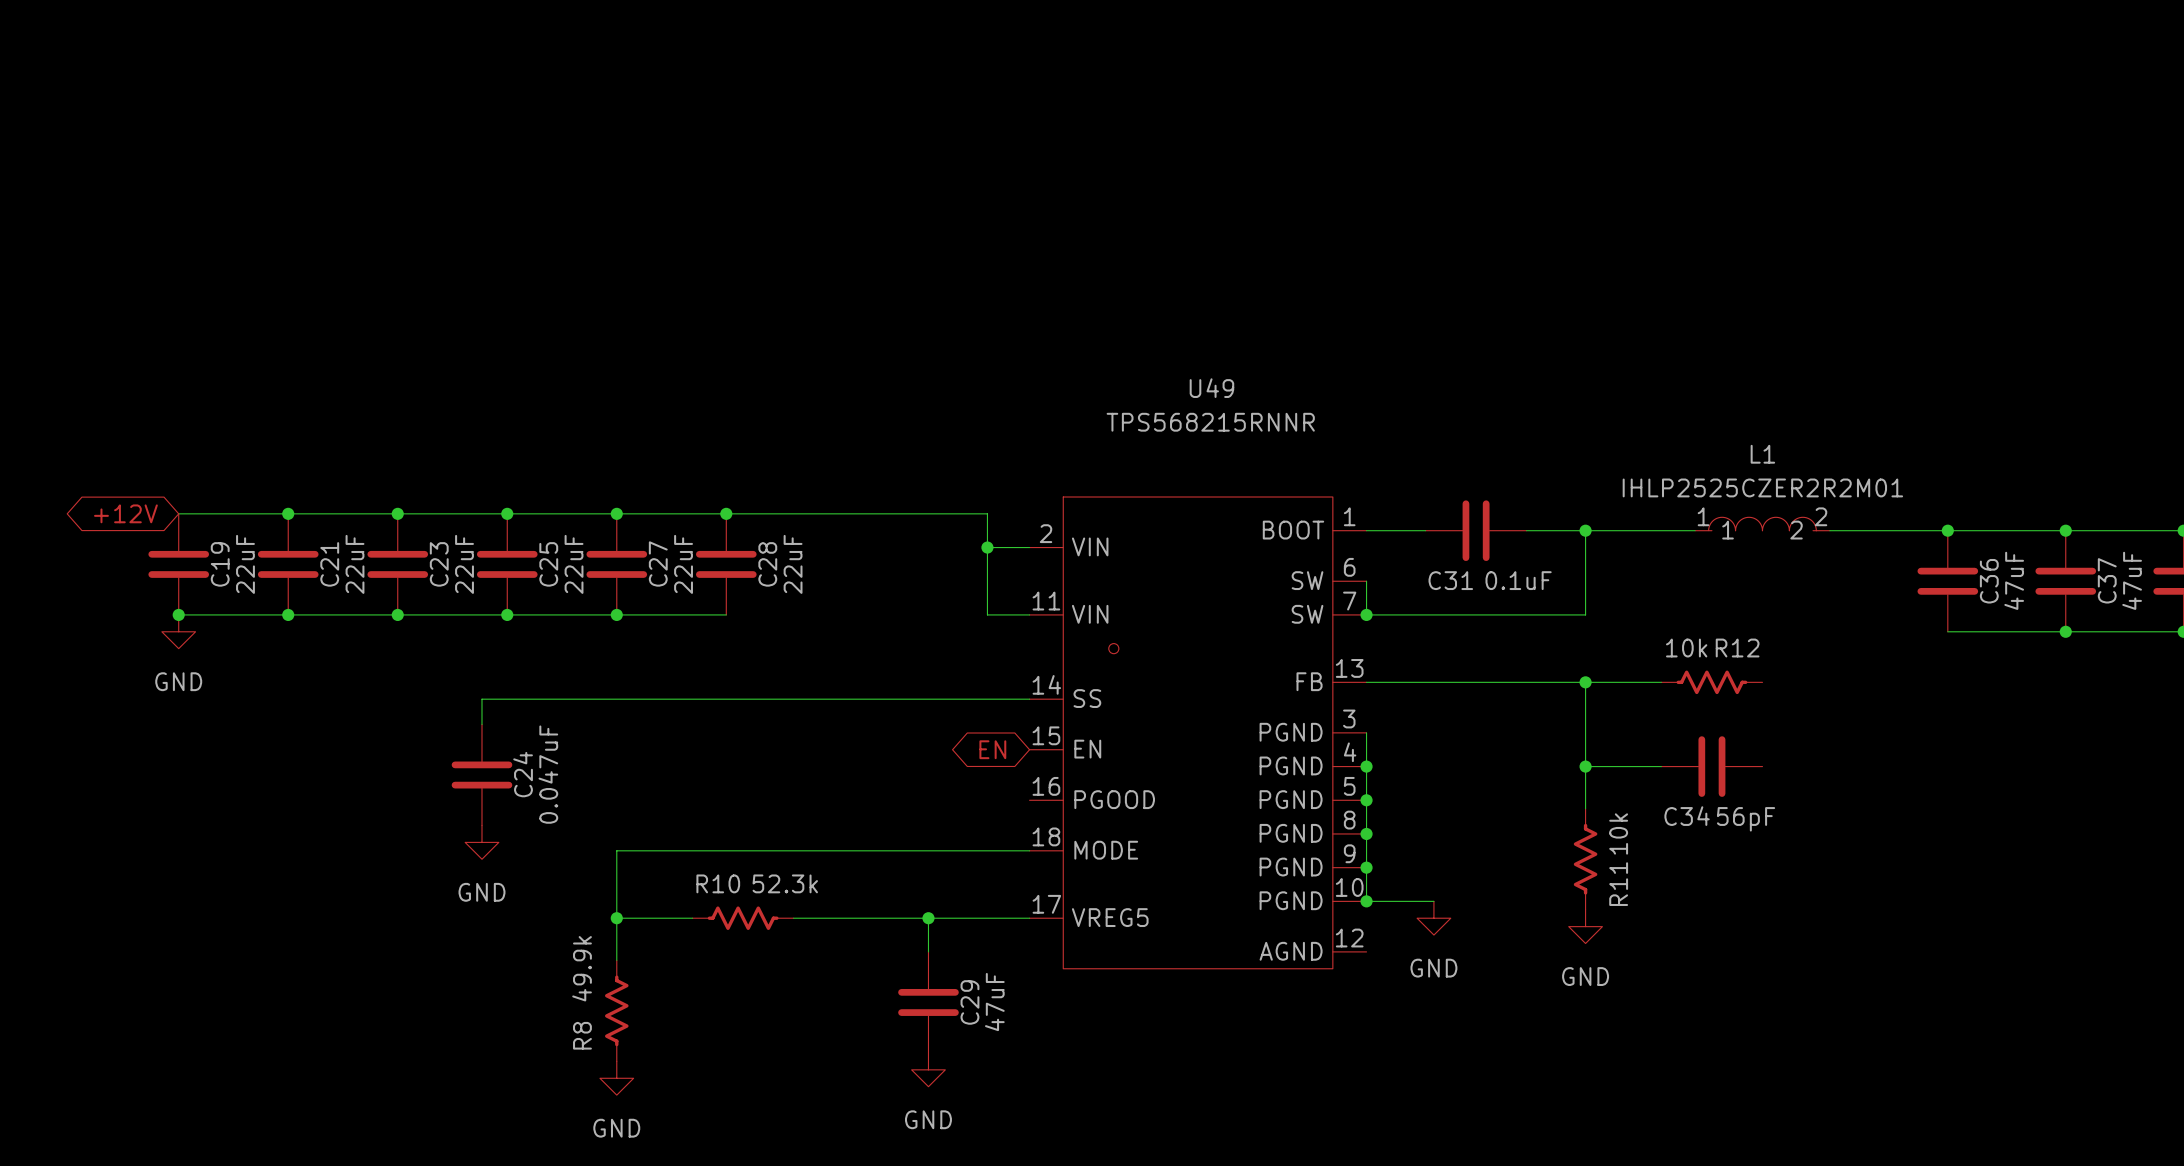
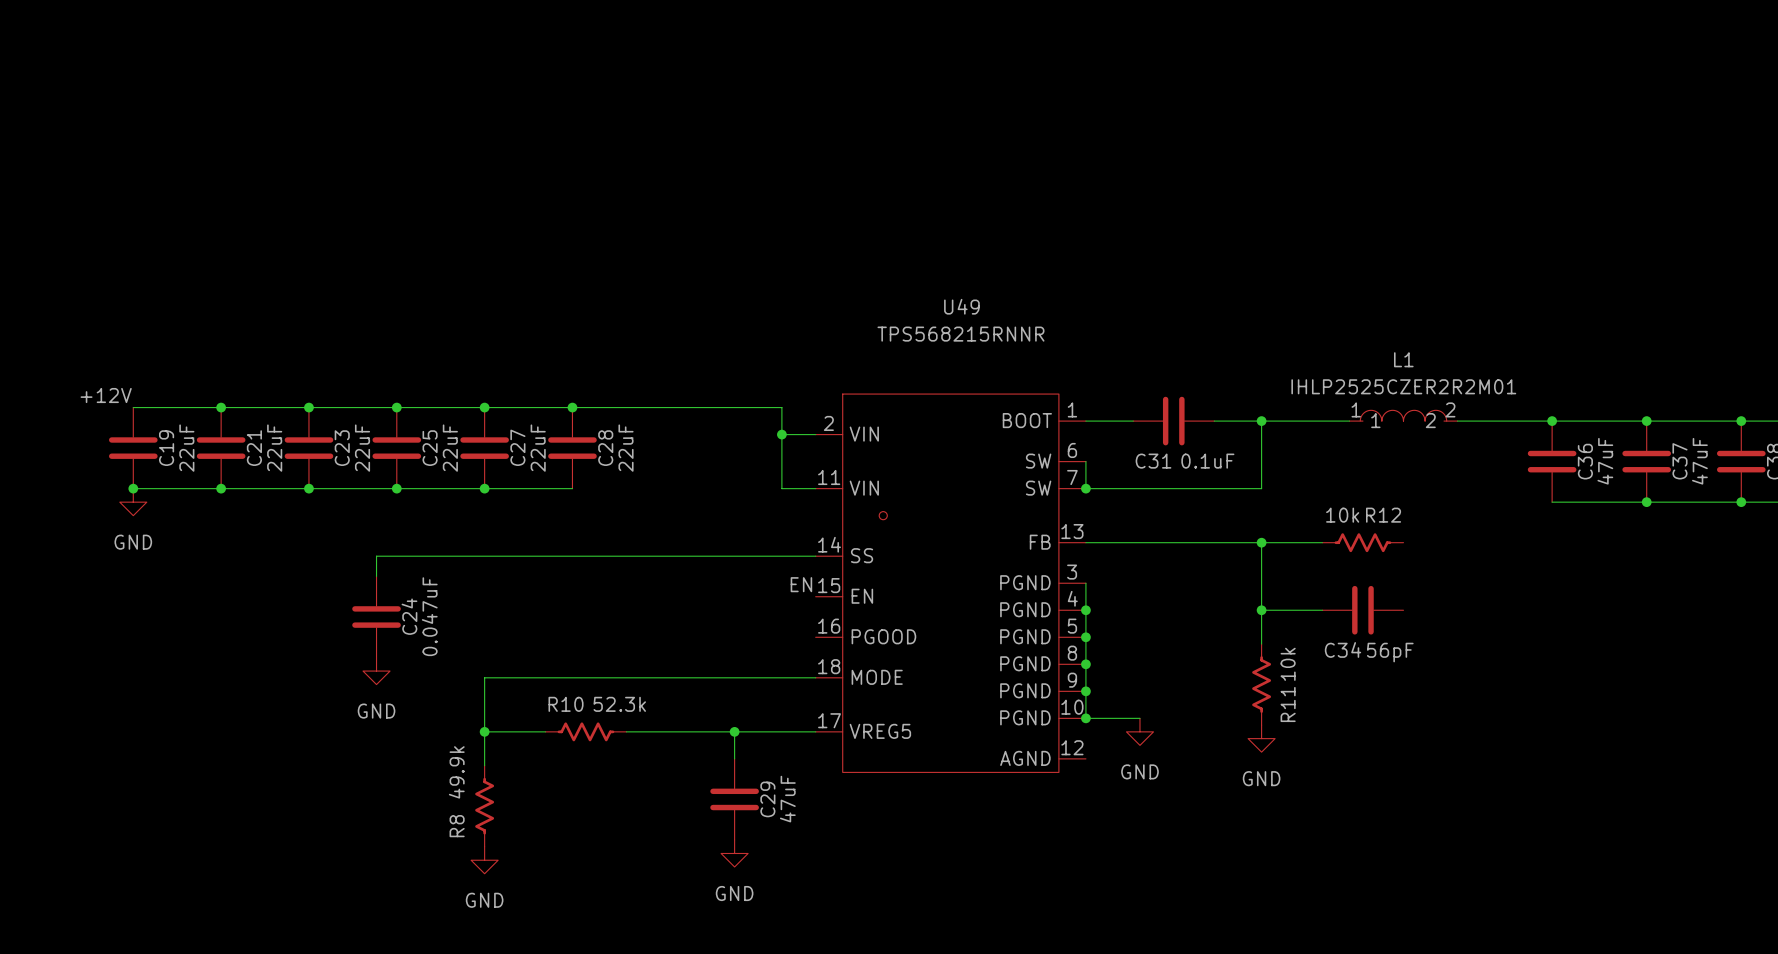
label: none -> +12V (106, 395)
global label: +12V (125, 513) -> none
label: none -> EN (801, 584)
global label: EN (992, 749) -> none

